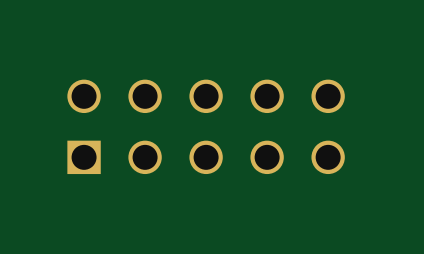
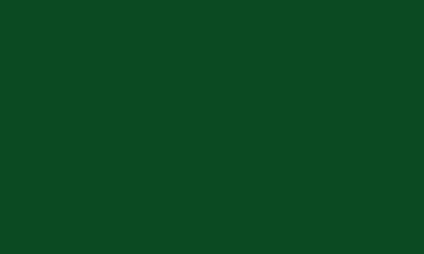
part: (206, 126) -> none

